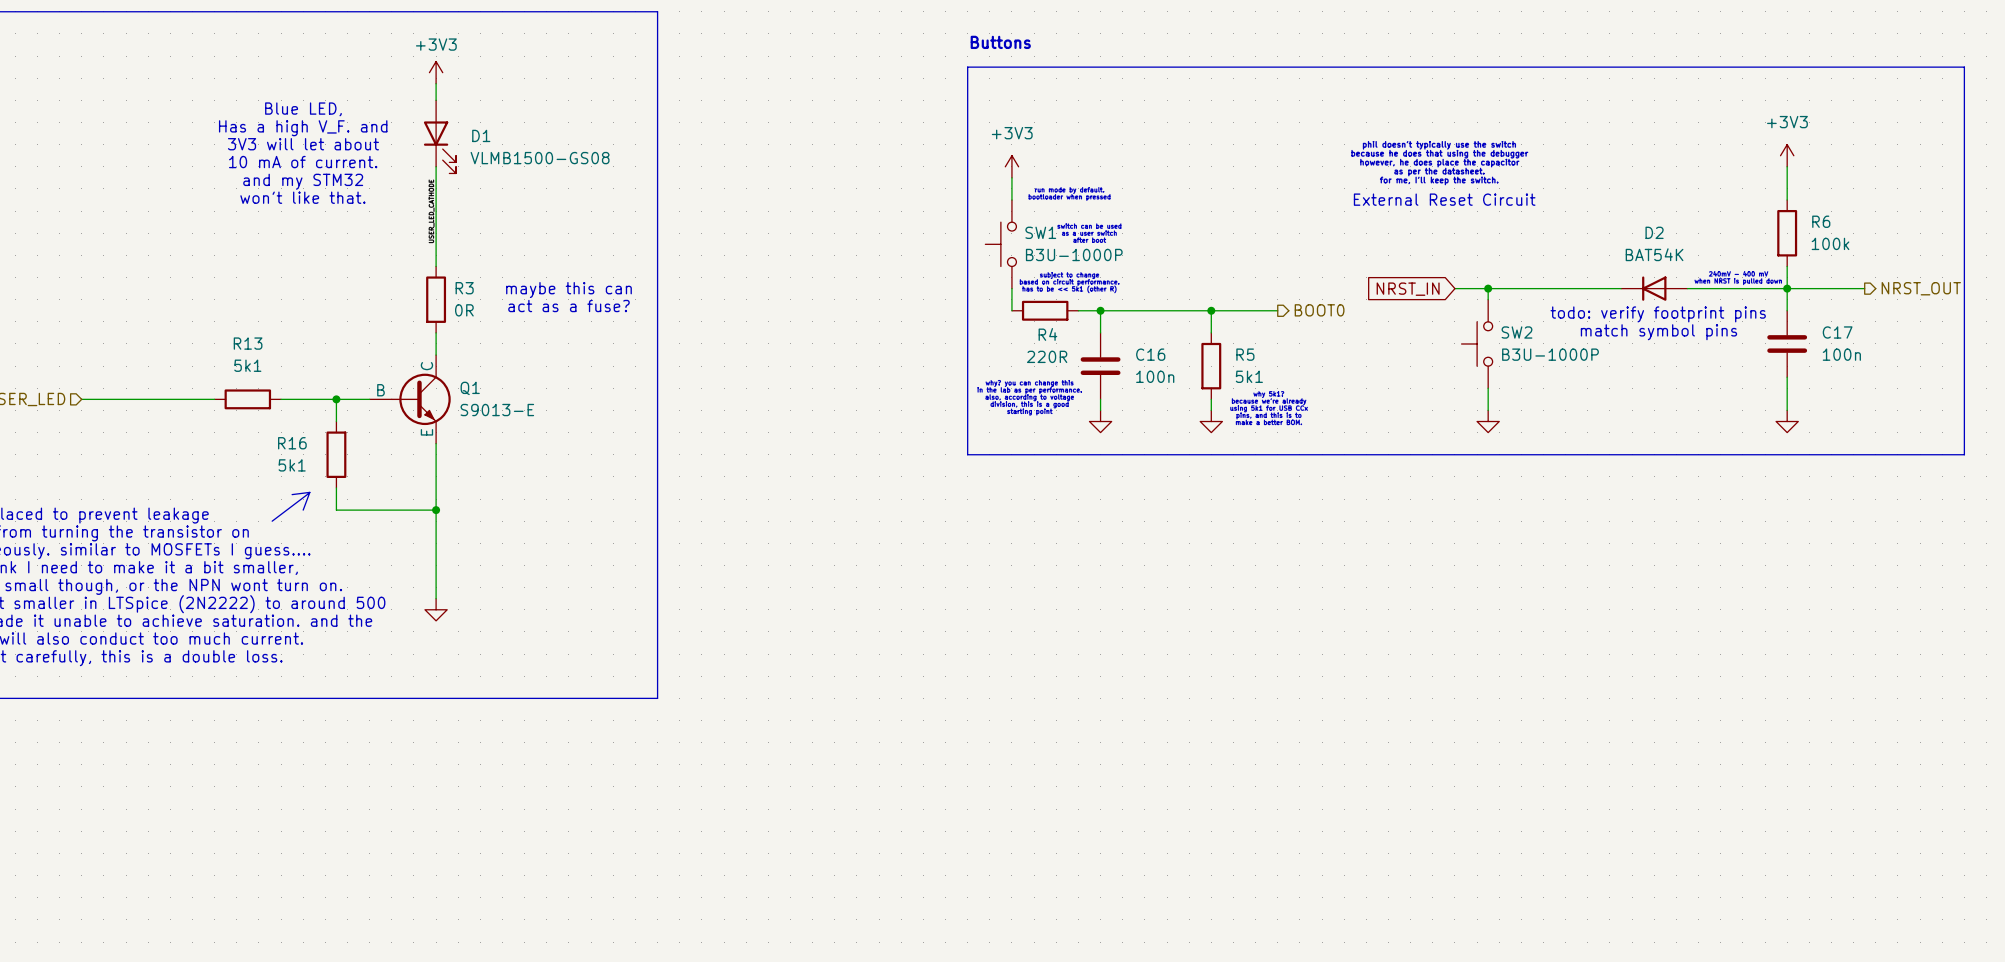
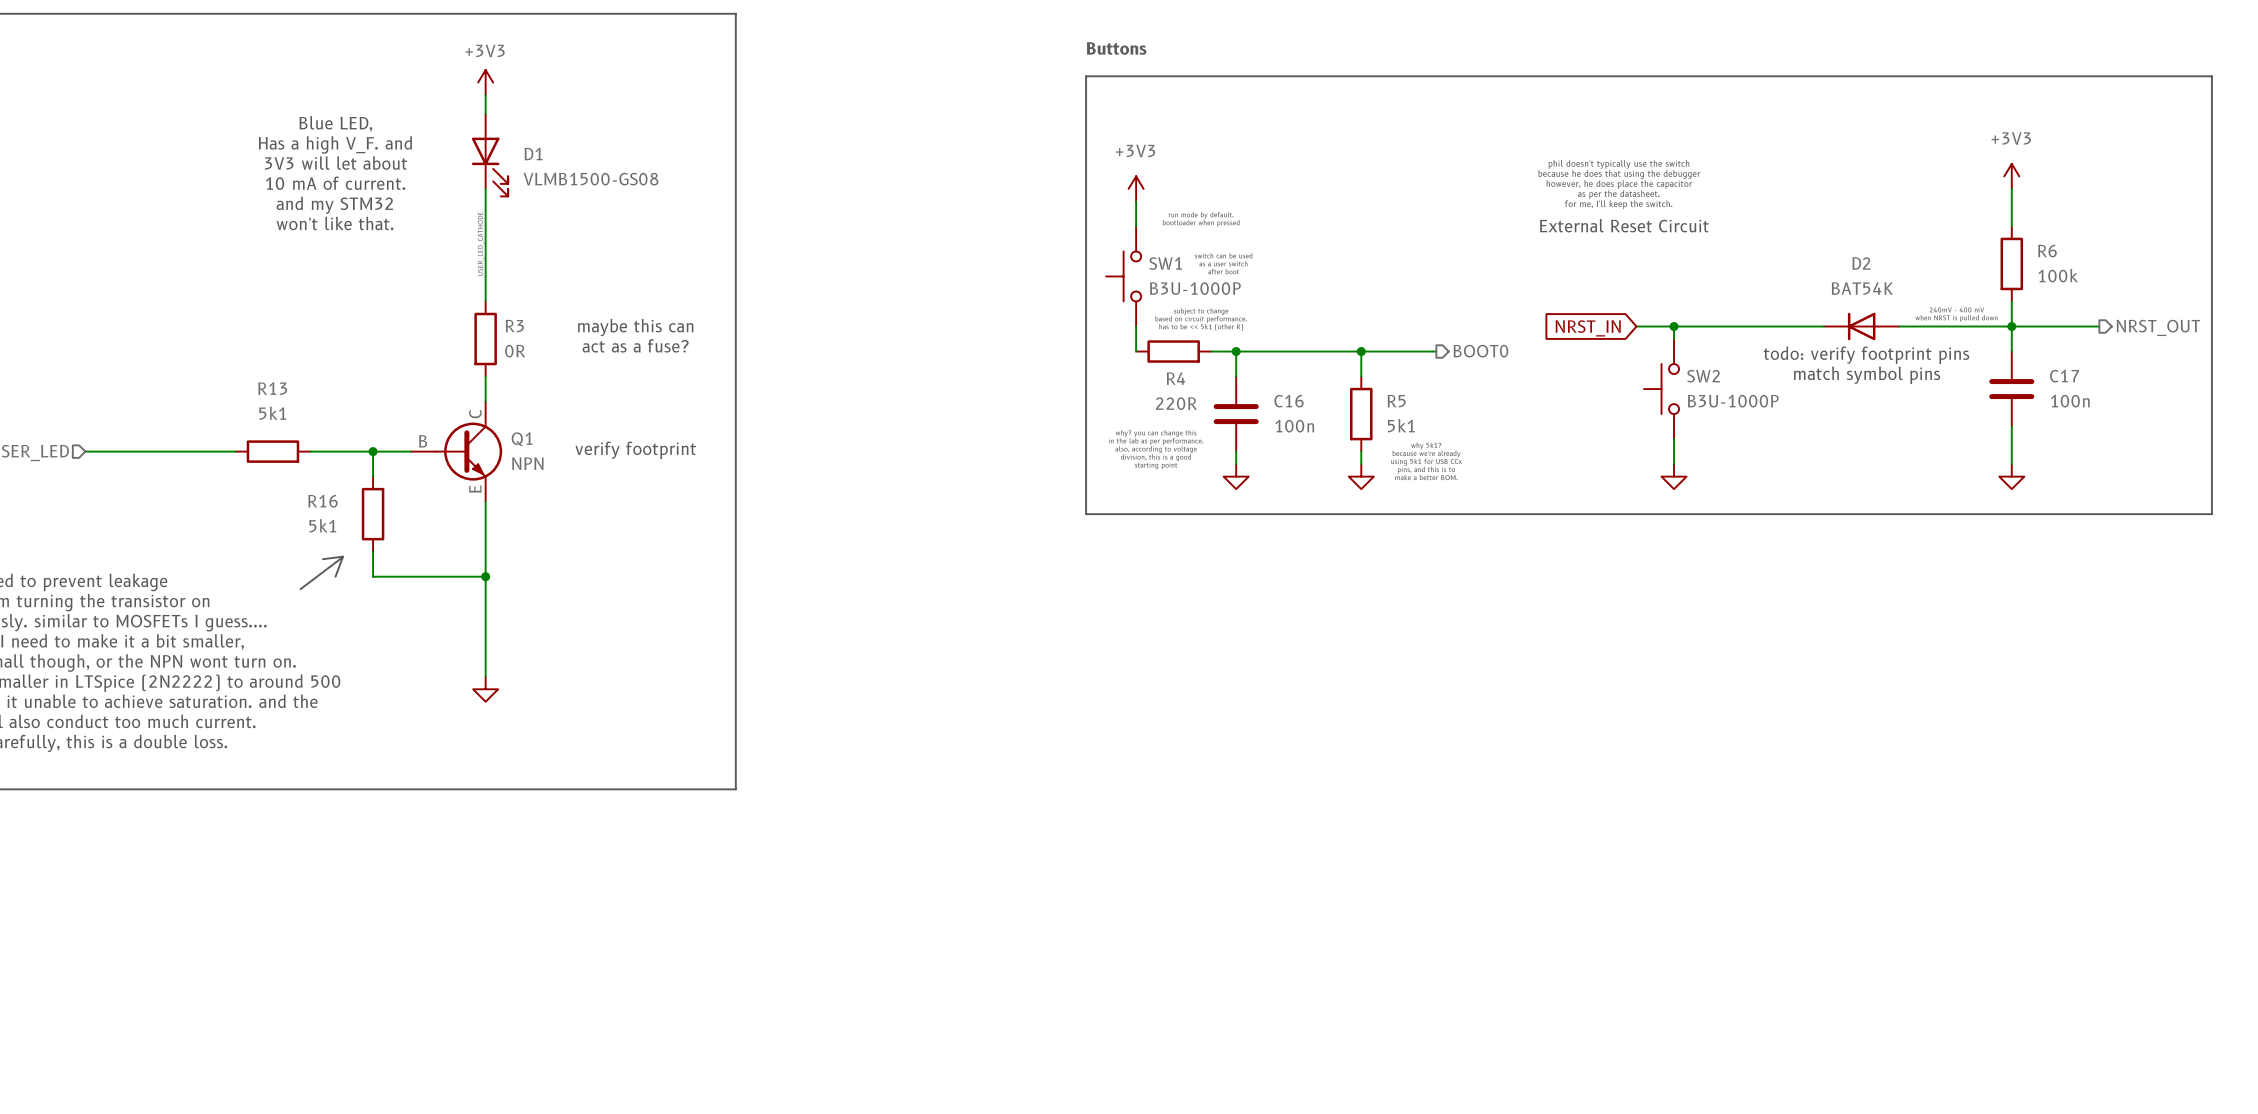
text: none -> verify footprint (635, 450)
Q1 value: S9013-E (497, 410) -> NPN (527, 463)

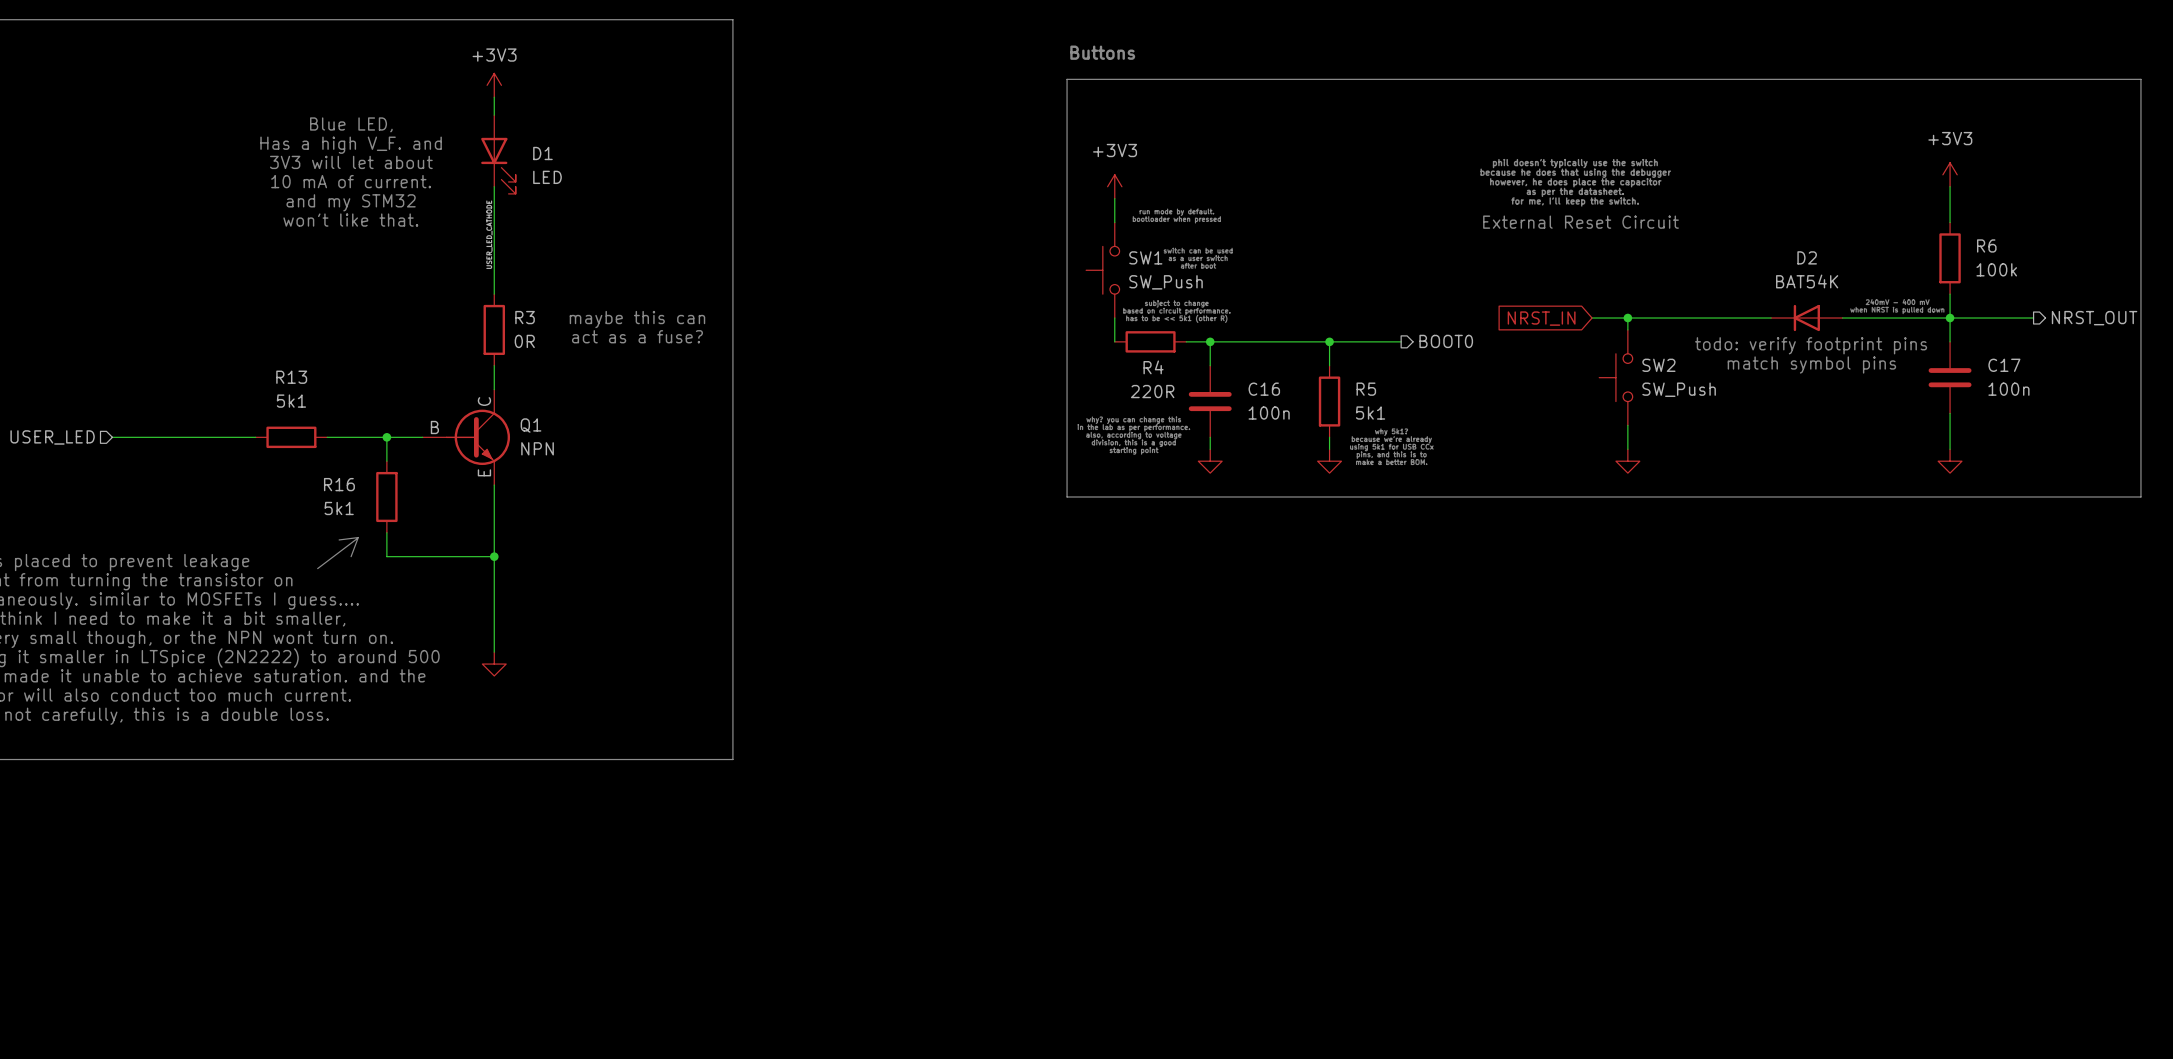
D1 value: VLMB1500-GS08 (591, 179) -> LED (547, 177)
SW1 value: B3U-1000P (1195, 288) -> SW_Push (1166, 282)
SW2 value: B3U-1000P (1733, 401) -> SW_Push (1679, 389)
text: verify footprint (635, 450) -> none

